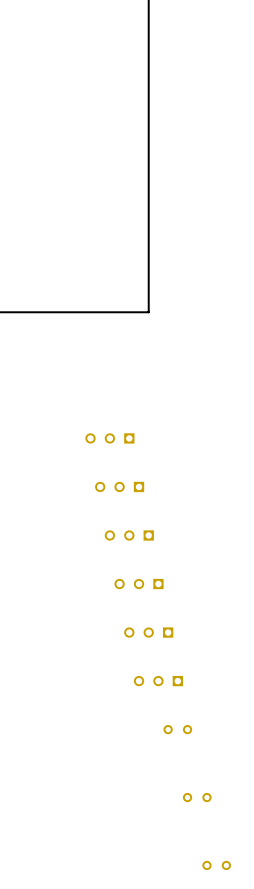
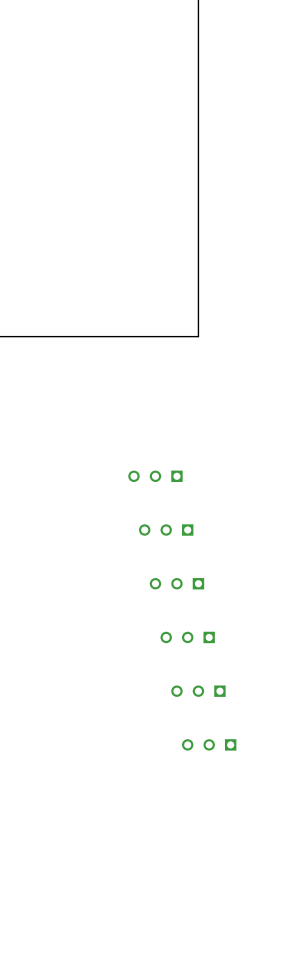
part: (177, 729) -> none
part: (197, 797) -> none
part: (216, 865) -> none

